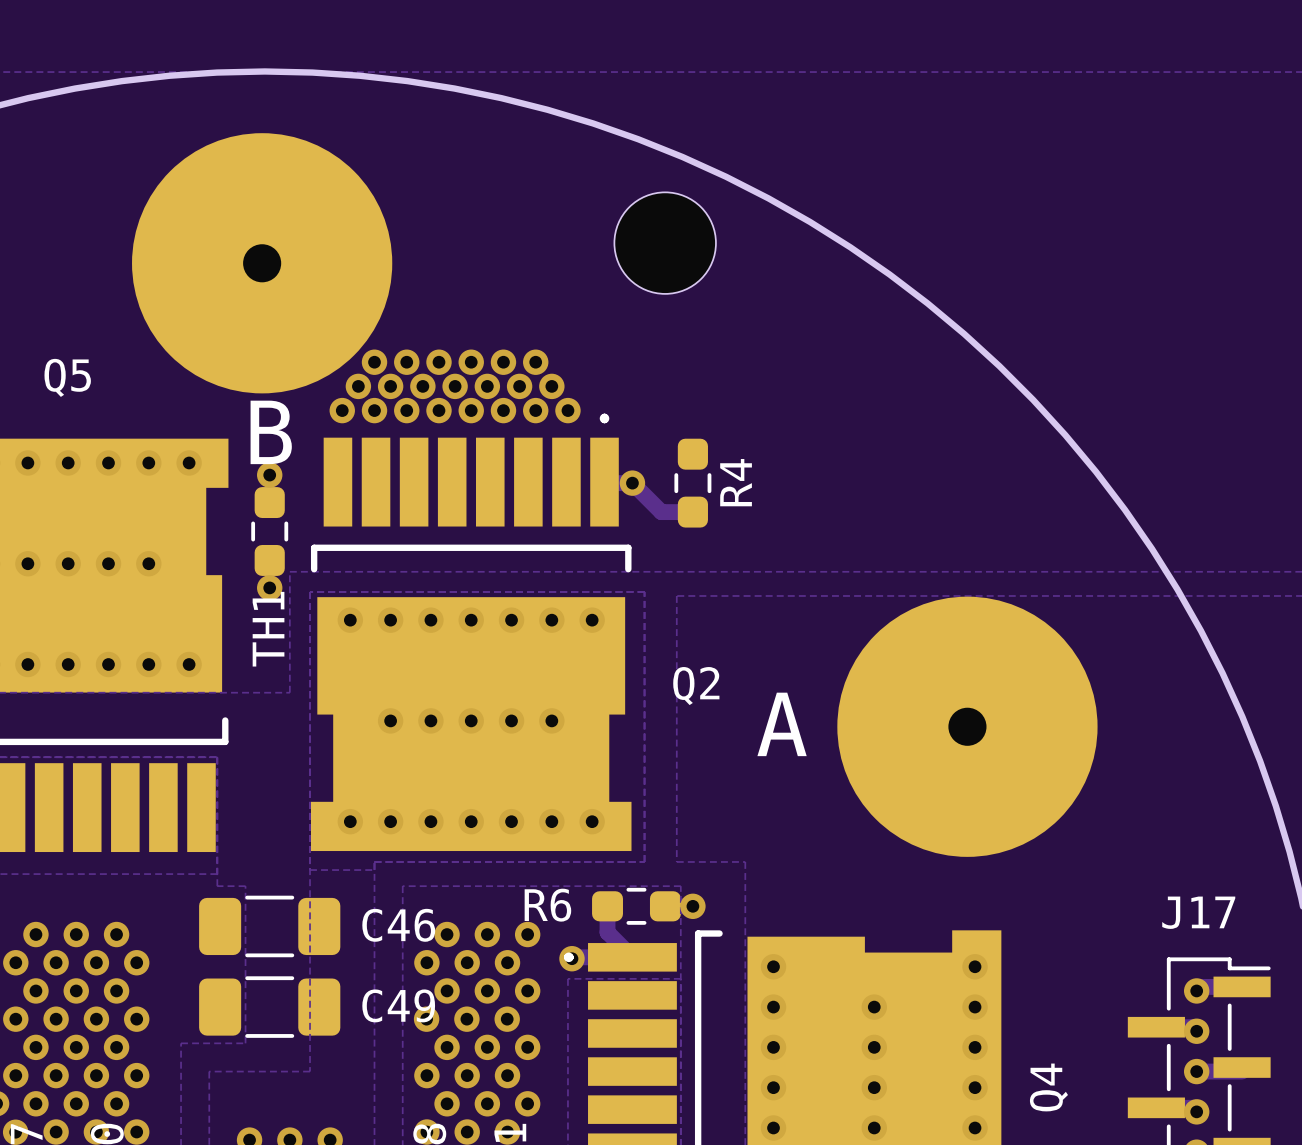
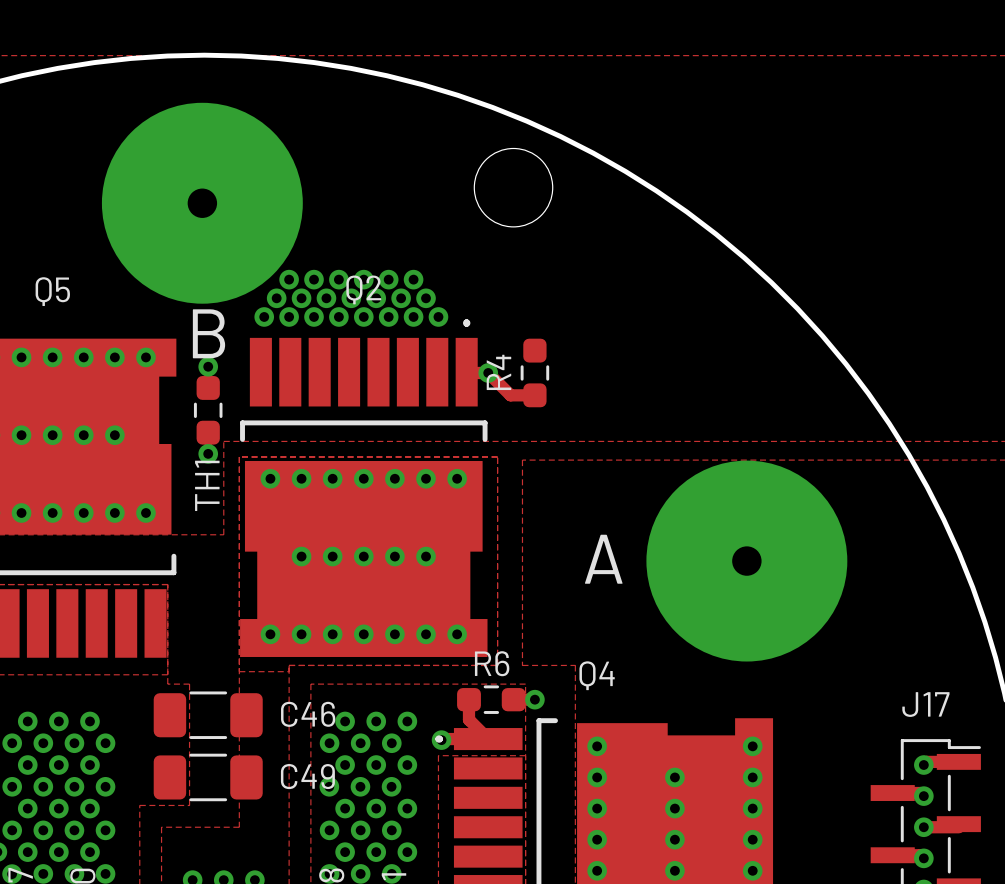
R4 name position: R4 (736, 482) -> R4 (498, 372)
Q2 name position: Q2 (696, 686) -> Q2 (363, 289)
R6 name position: R6 (547, 905) -> R6 (492, 663)
Q4 name rotation: 0° (1048, 1087) -> 90° clockwise (597, 675)
Q4 name position: Q4 (1048, 1087) -> Q4 (597, 675)

